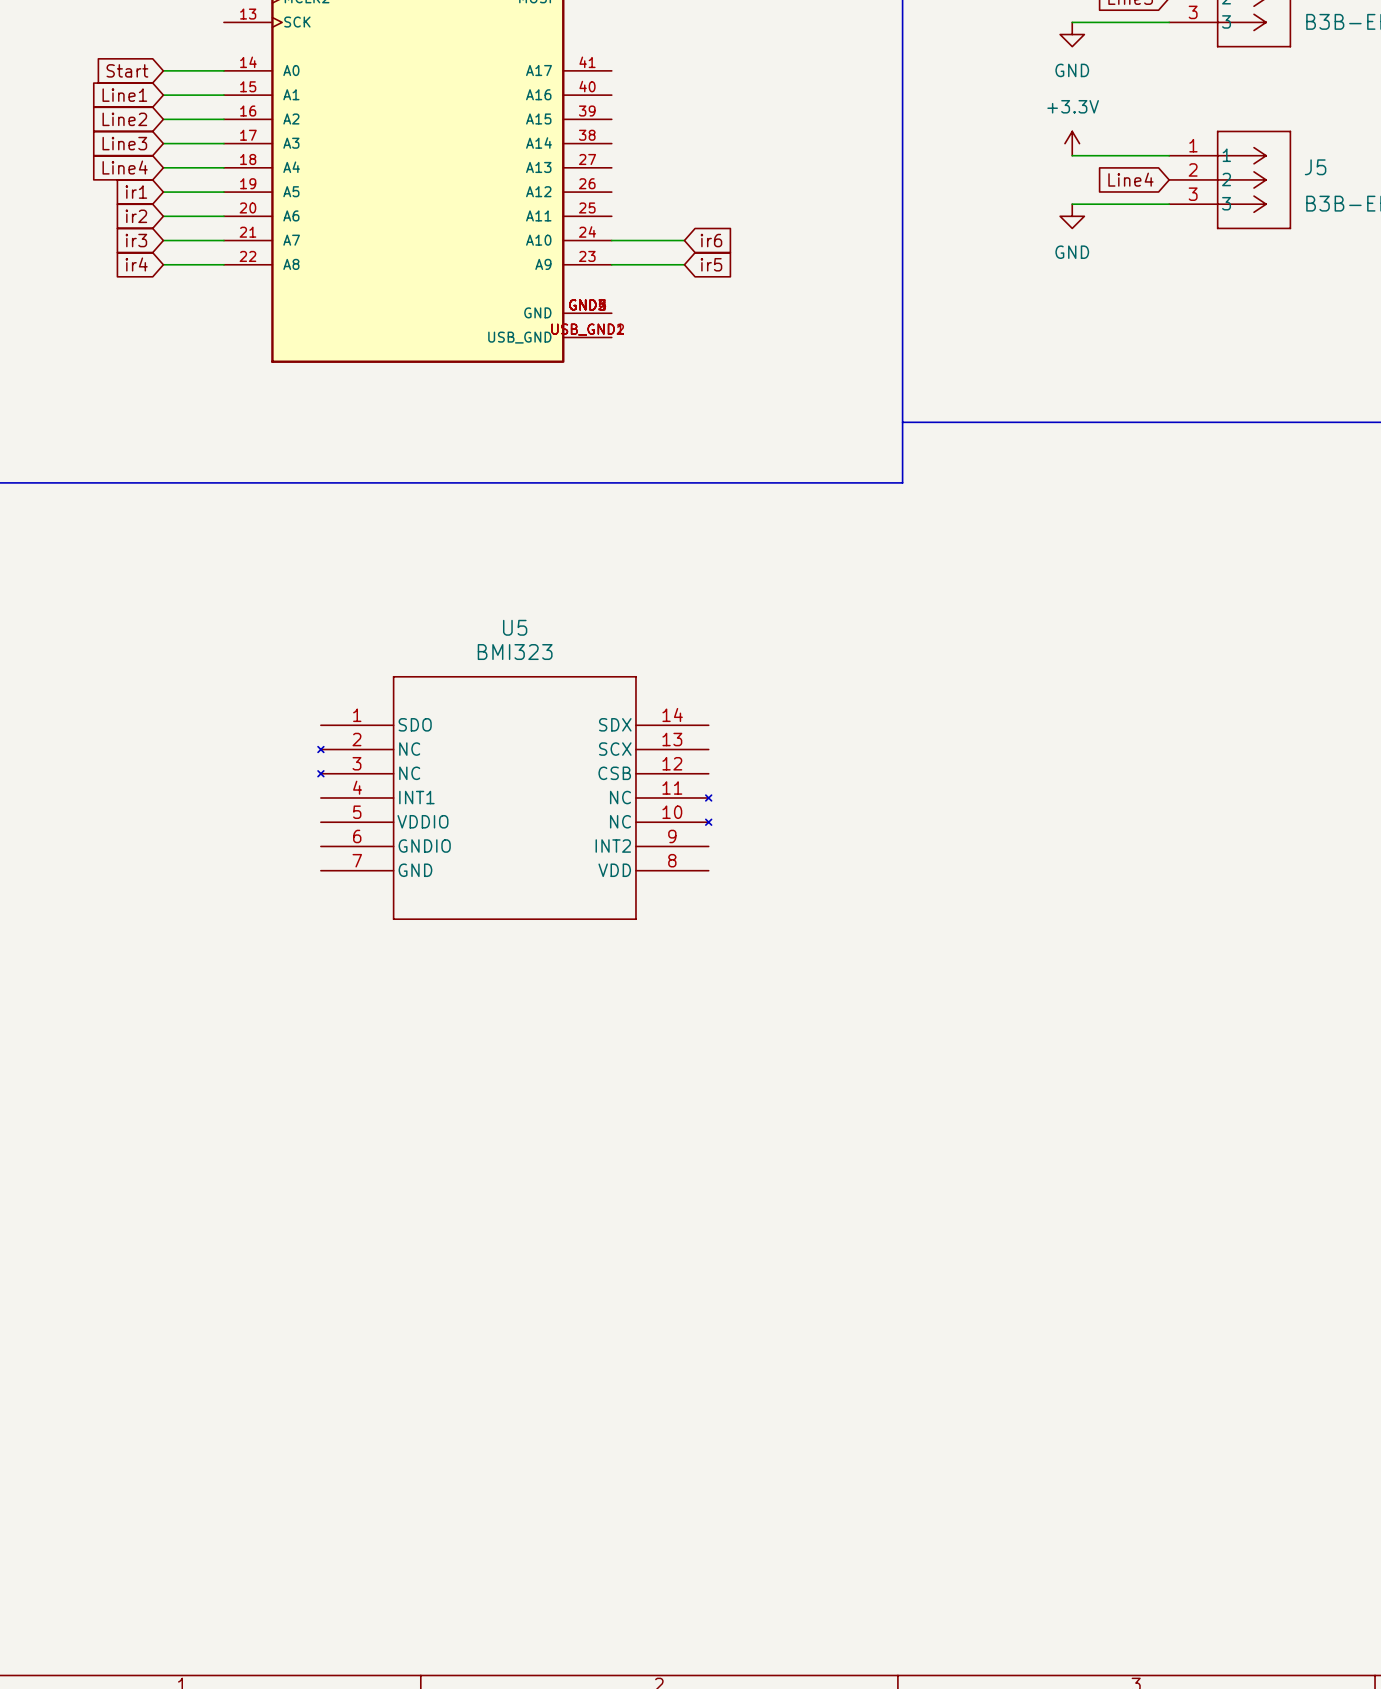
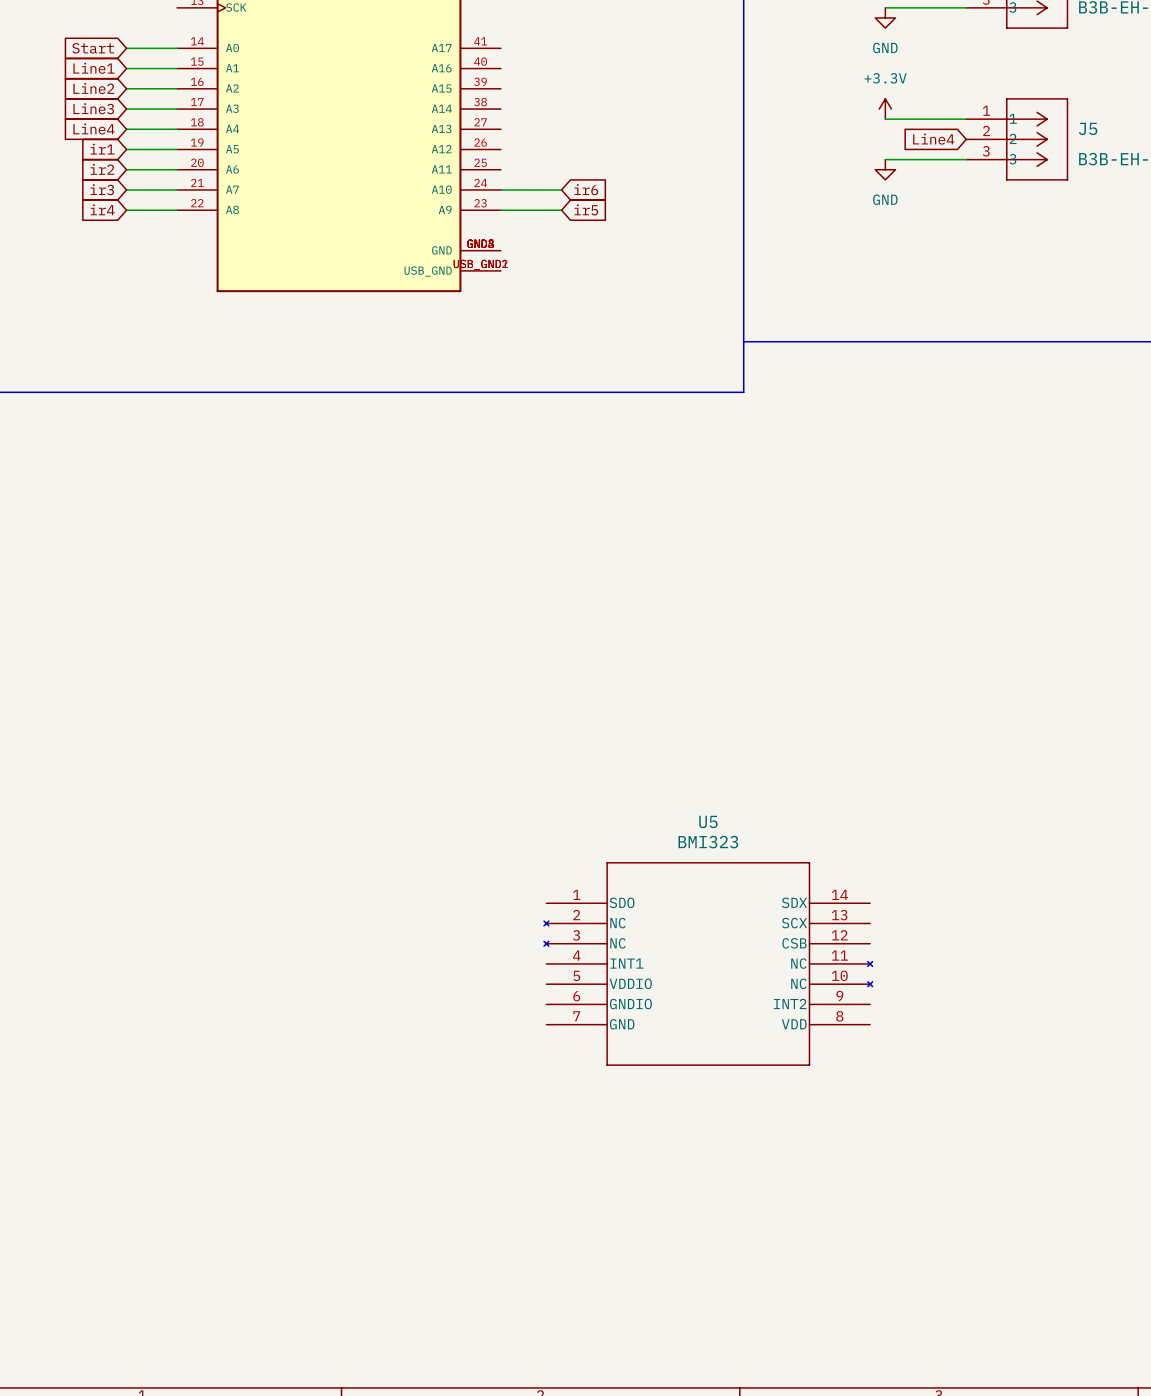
U5 position: (514, 797) -> (708, 963)

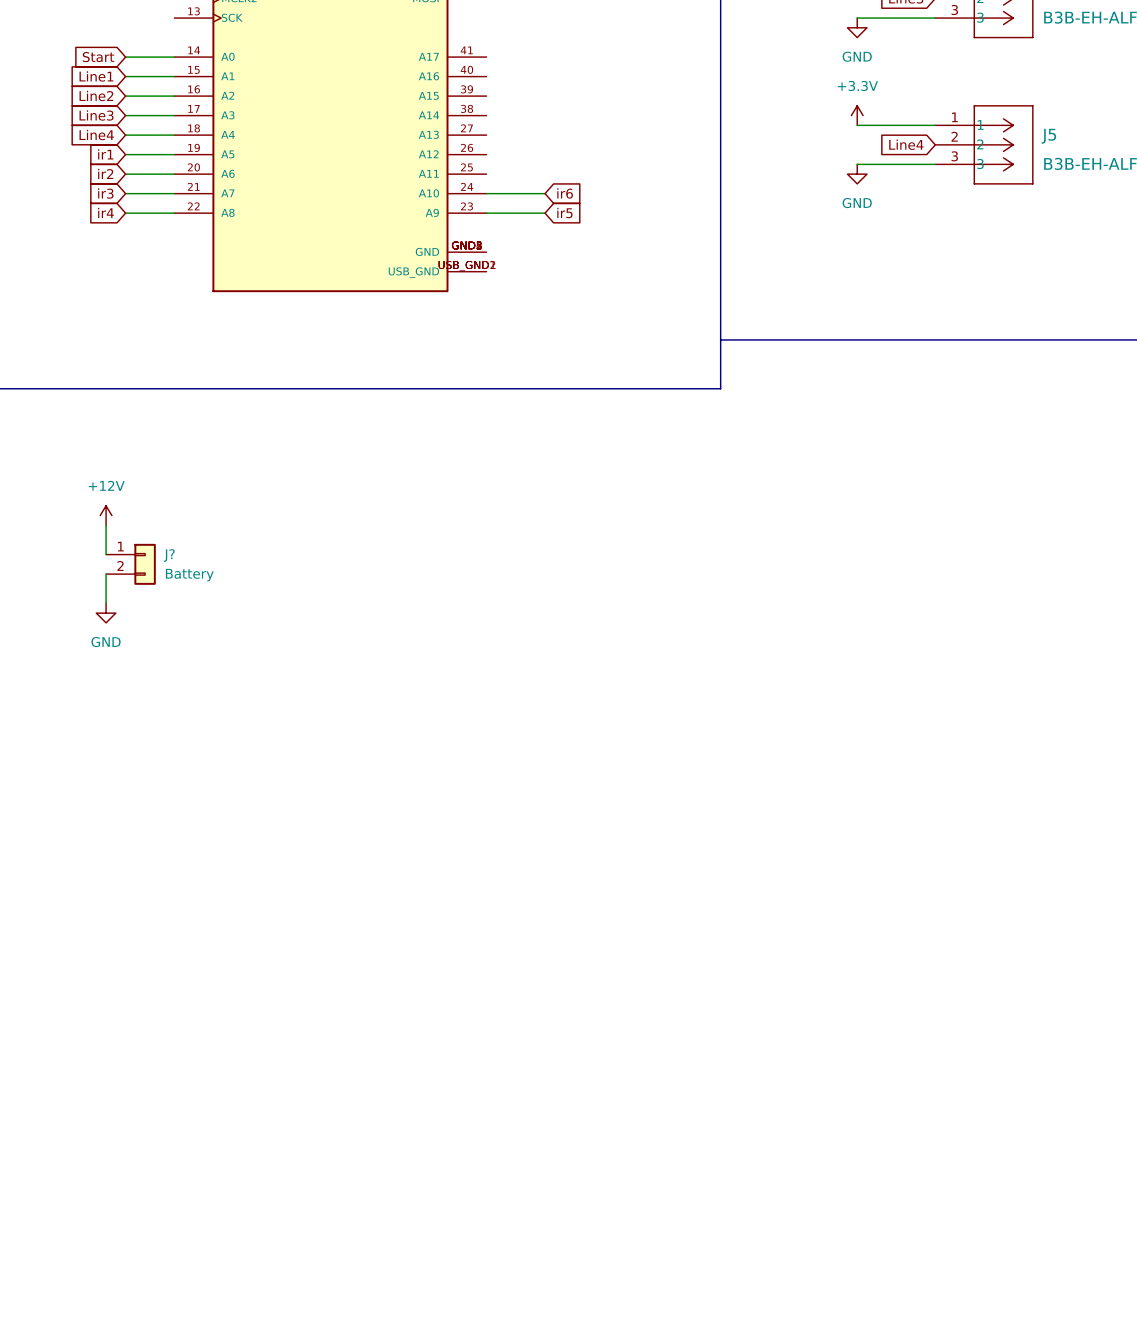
power symbol: none -> +12V (106, 515)
wire: none -> (106, 525) (106, 554)
J?: none -> Battery (130, 564)
wire: none -> (106, 574) (106, 603)
power symbol: none -> GND (106, 613)
U5: BMI323 (708, 963) -> none

